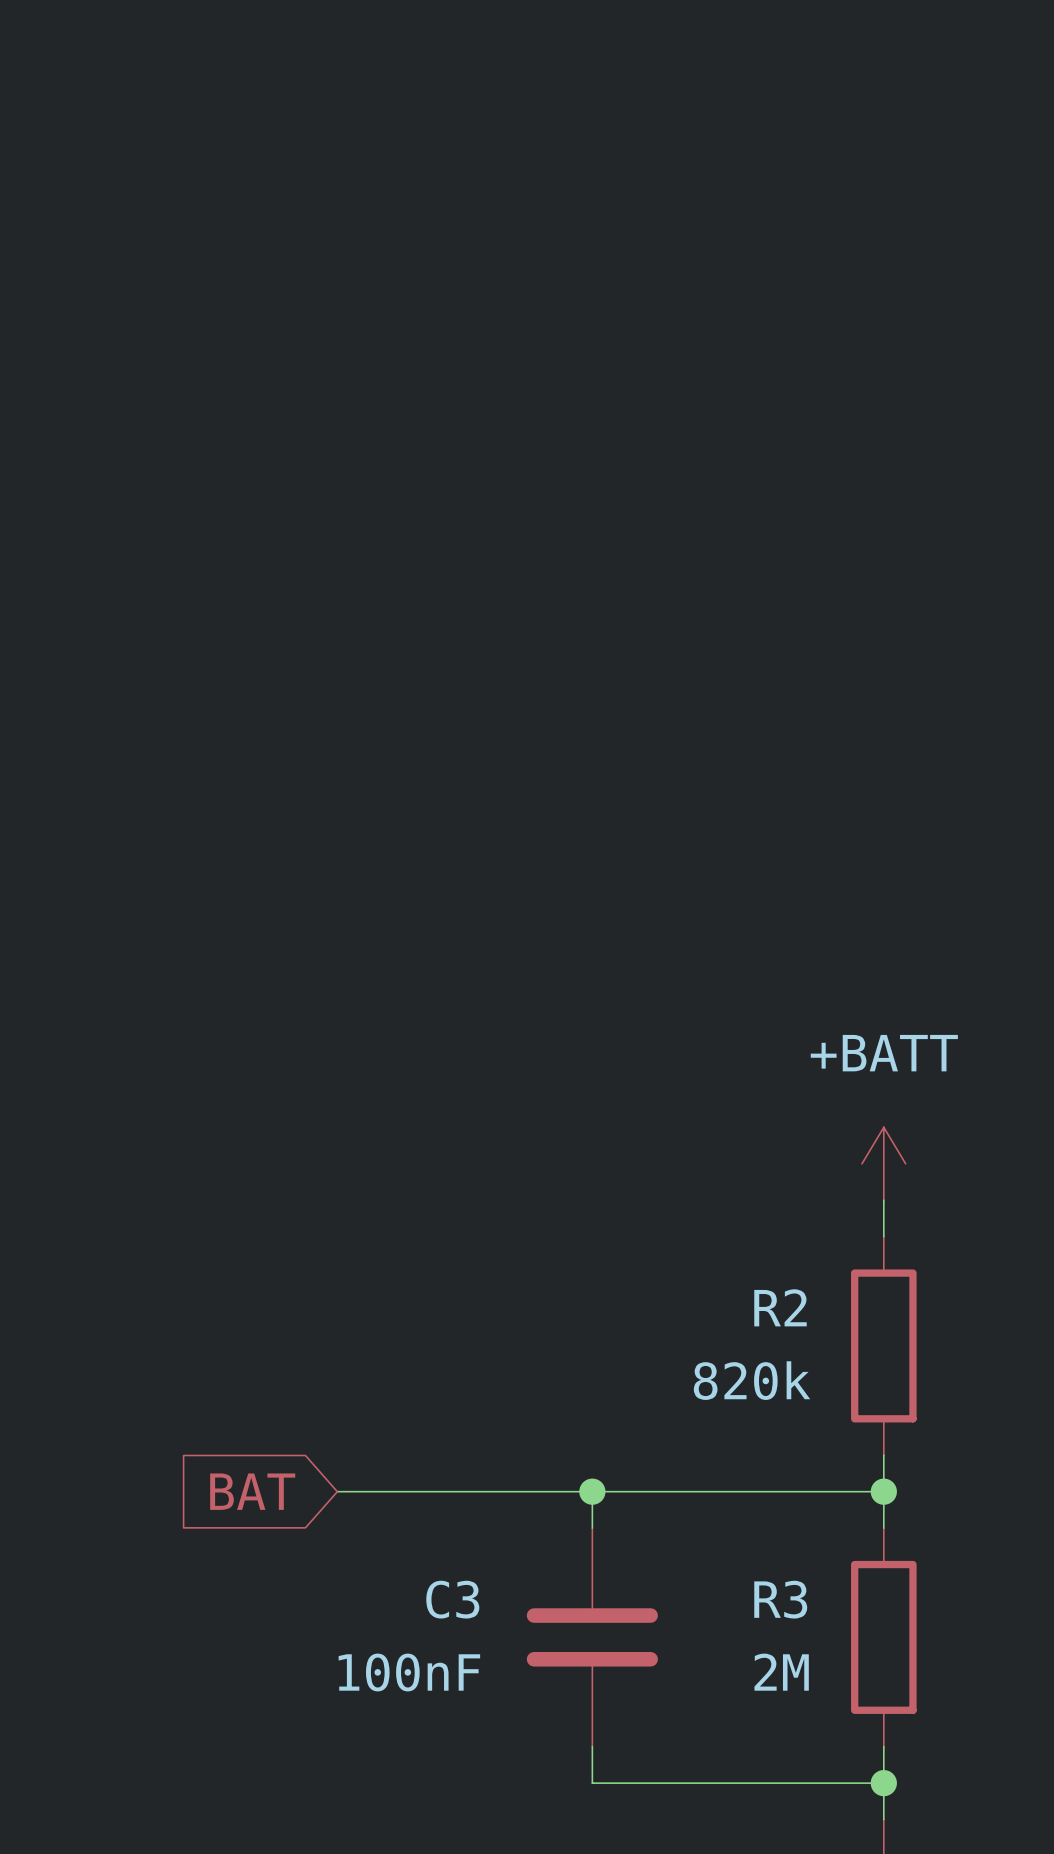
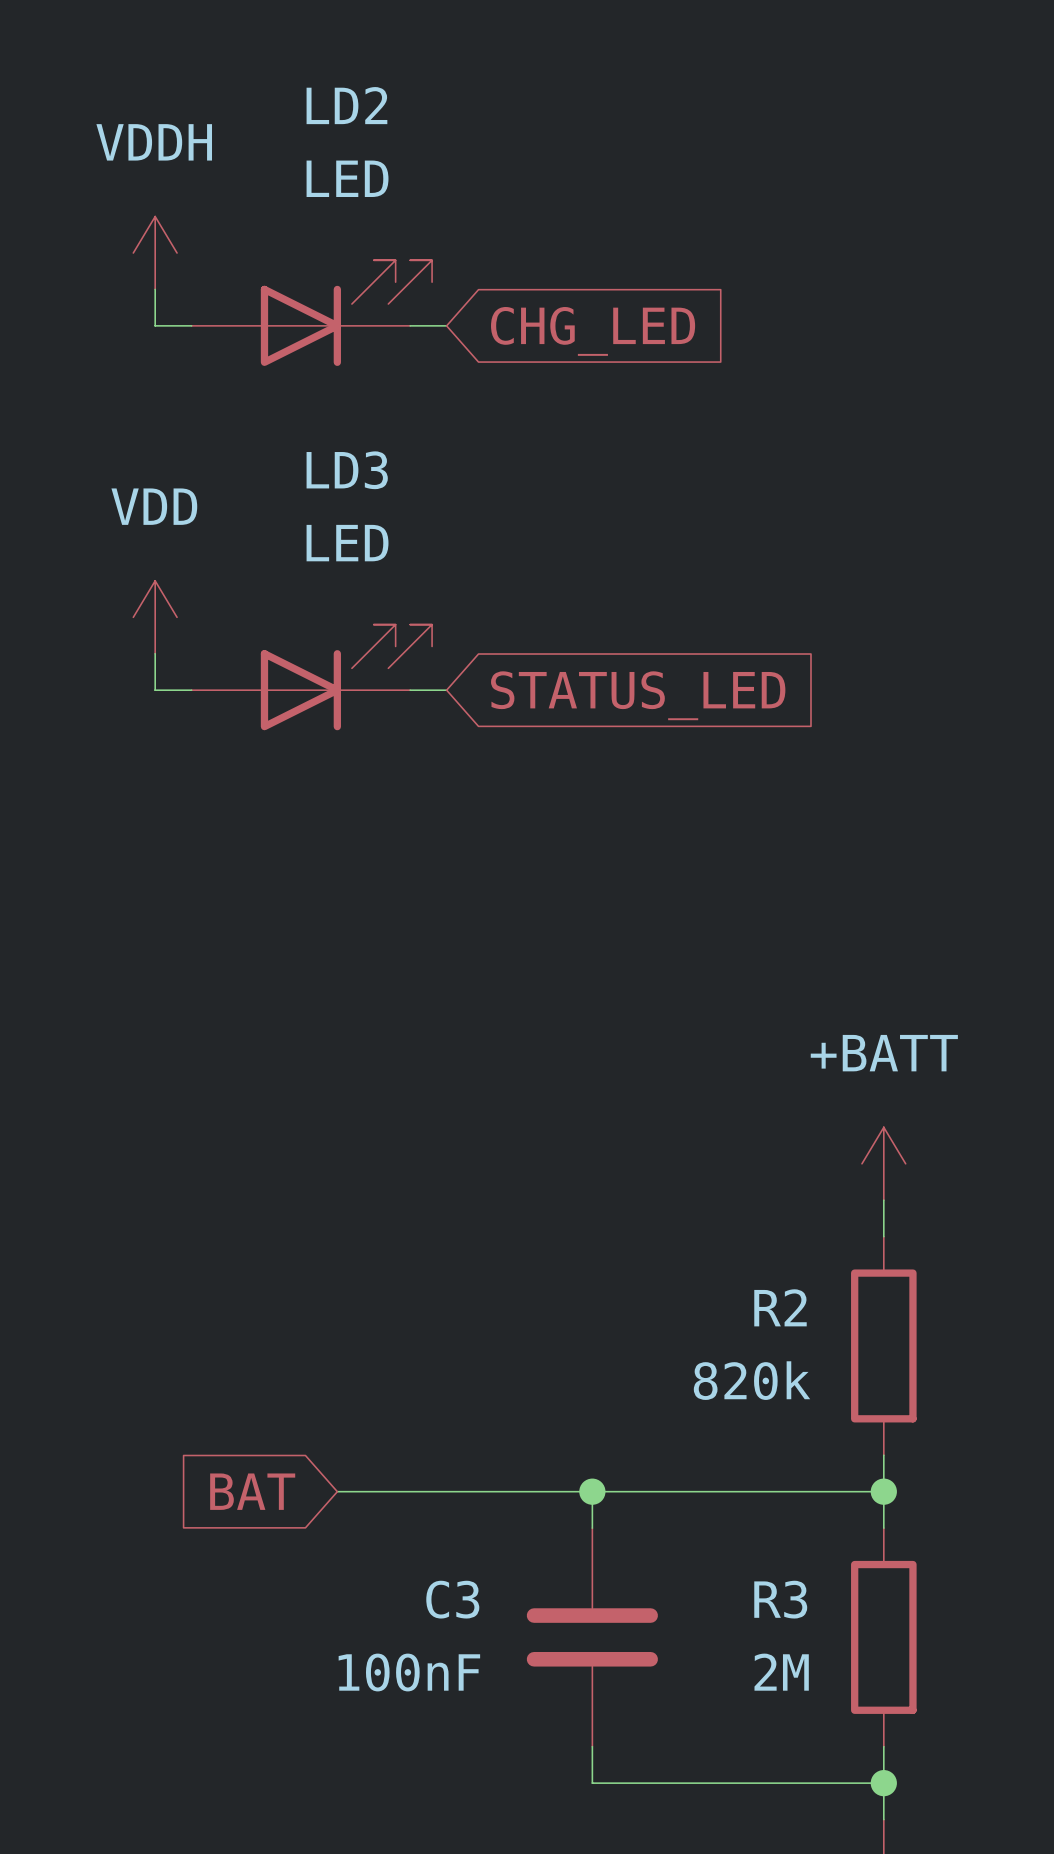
power symbol: none -> VDDH (155, 253)
wire: none -> (155, 289) (155, 325) (191, 325)
LD2: none -> LED (311, 313)
wire: none -> (410, 325) (446, 325)
global label: none -> CHG_LED (593, 331)
power symbol: none -> VDD (155, 617)
wire: none -> (155, 653) (155, 690) (191, 690)
LD3: none -> LED (311, 677)
wire: none -> (410, 690) (446, 690)
global label: none -> STATUS_LED (638, 695)

